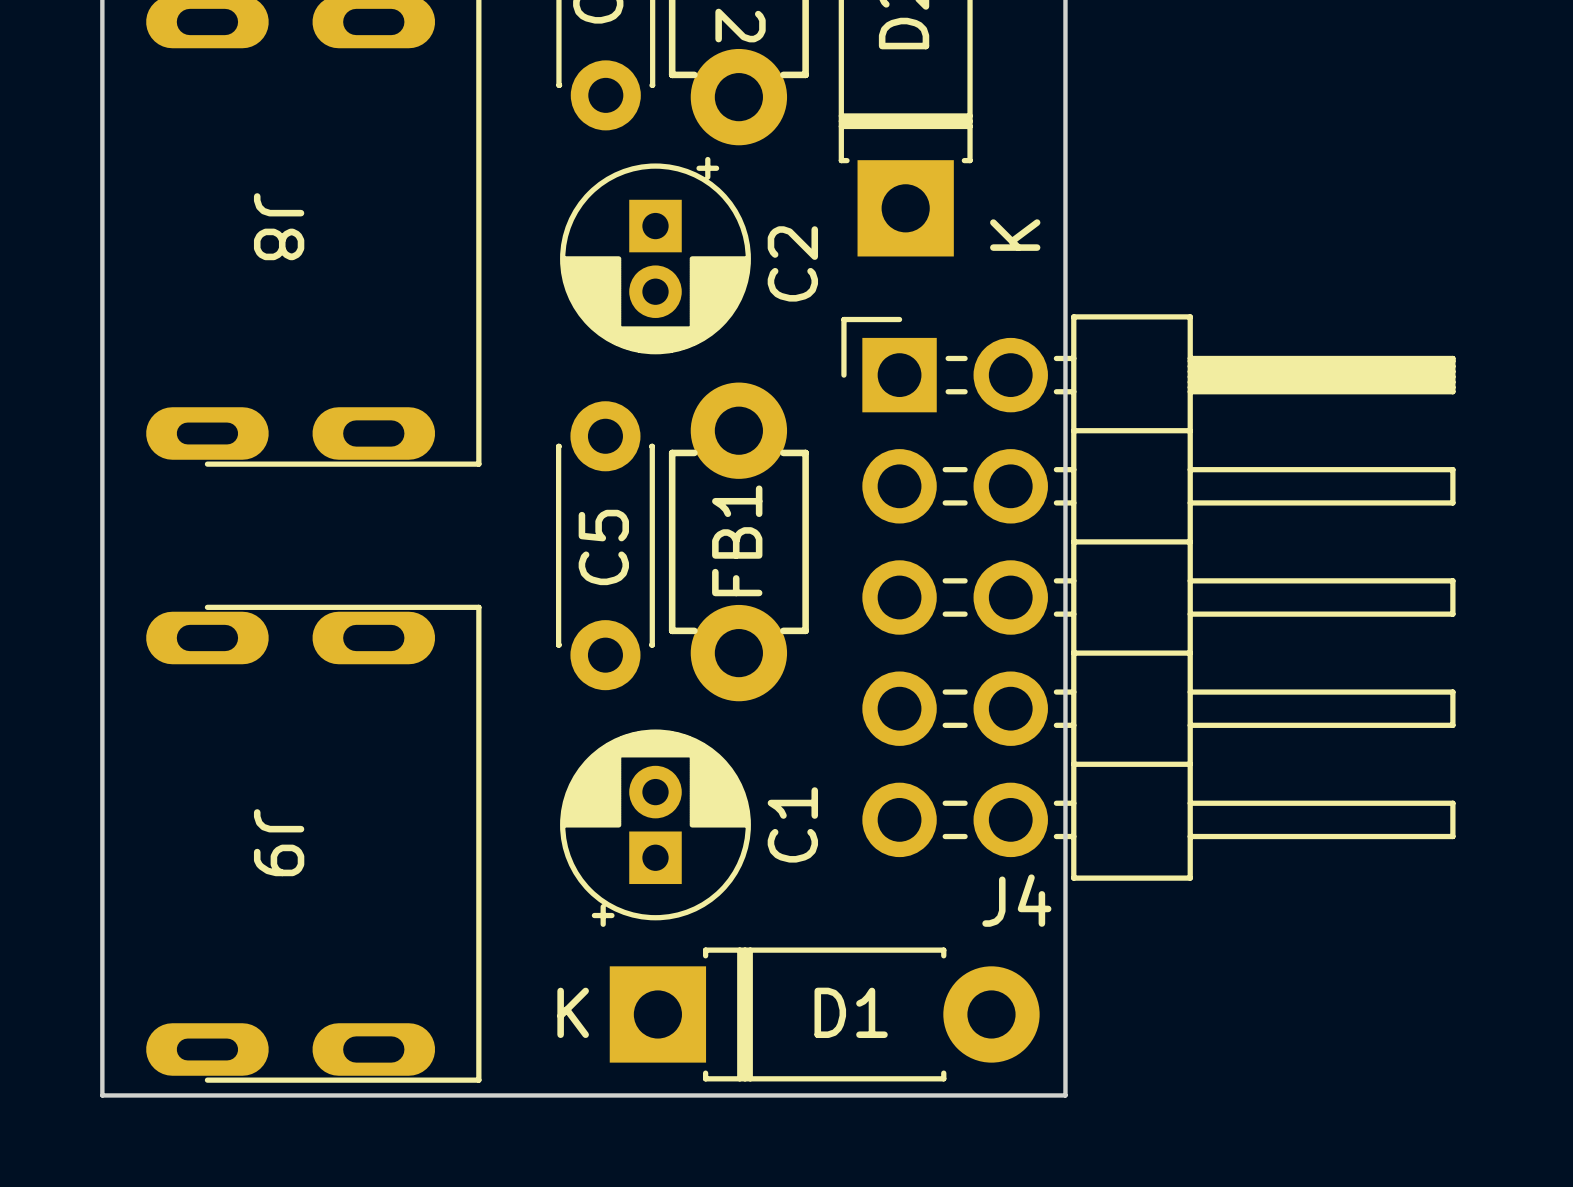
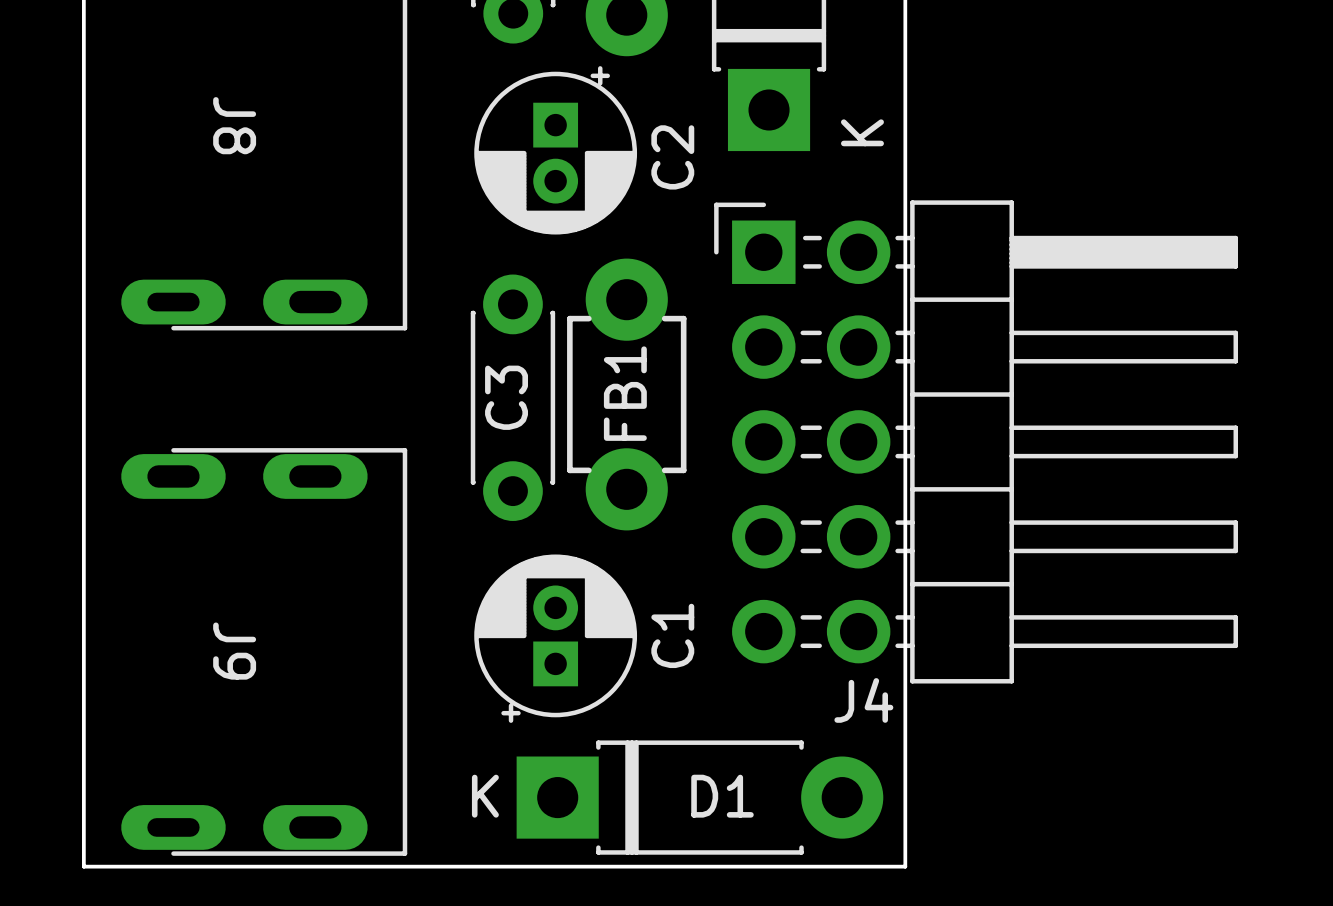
C5 name: C5 (603, 547) -> C3 (506, 397)

